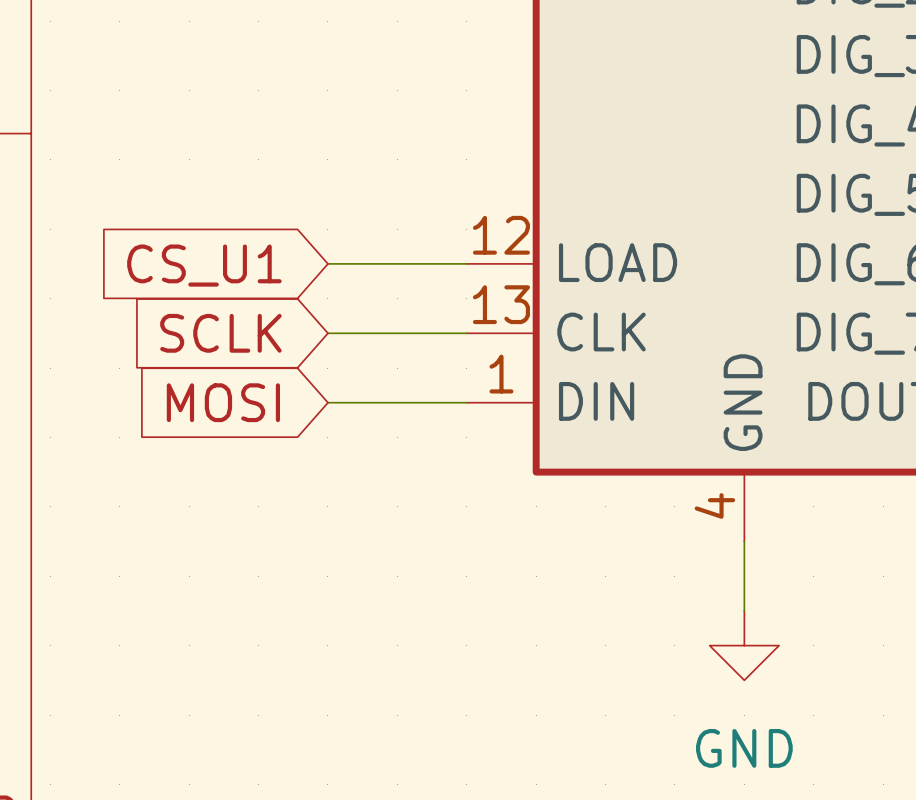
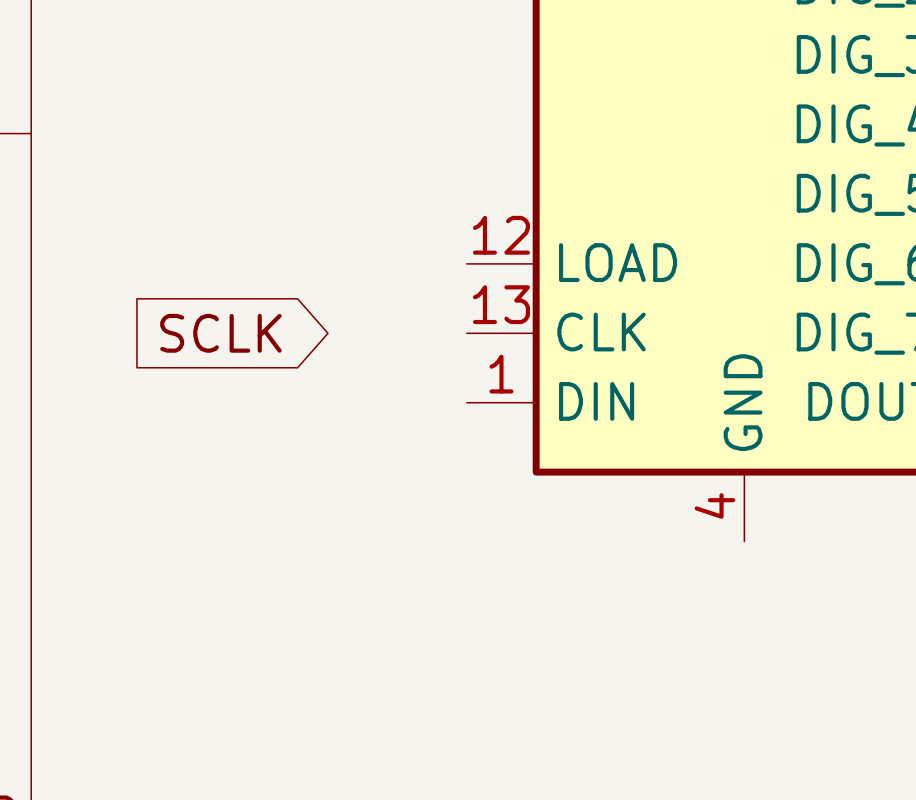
wire: (327, 263) (466, 263) -> none
global label: CS_U1 (204, 265) -> none
wire: (327, 333) (466, 333) -> none
global label: MOSI (223, 402) -> none
wire: (327, 402) (466, 402) -> none
wire: (744, 541) (744, 610) -> none
power symbol: GND (744, 645) -> none

